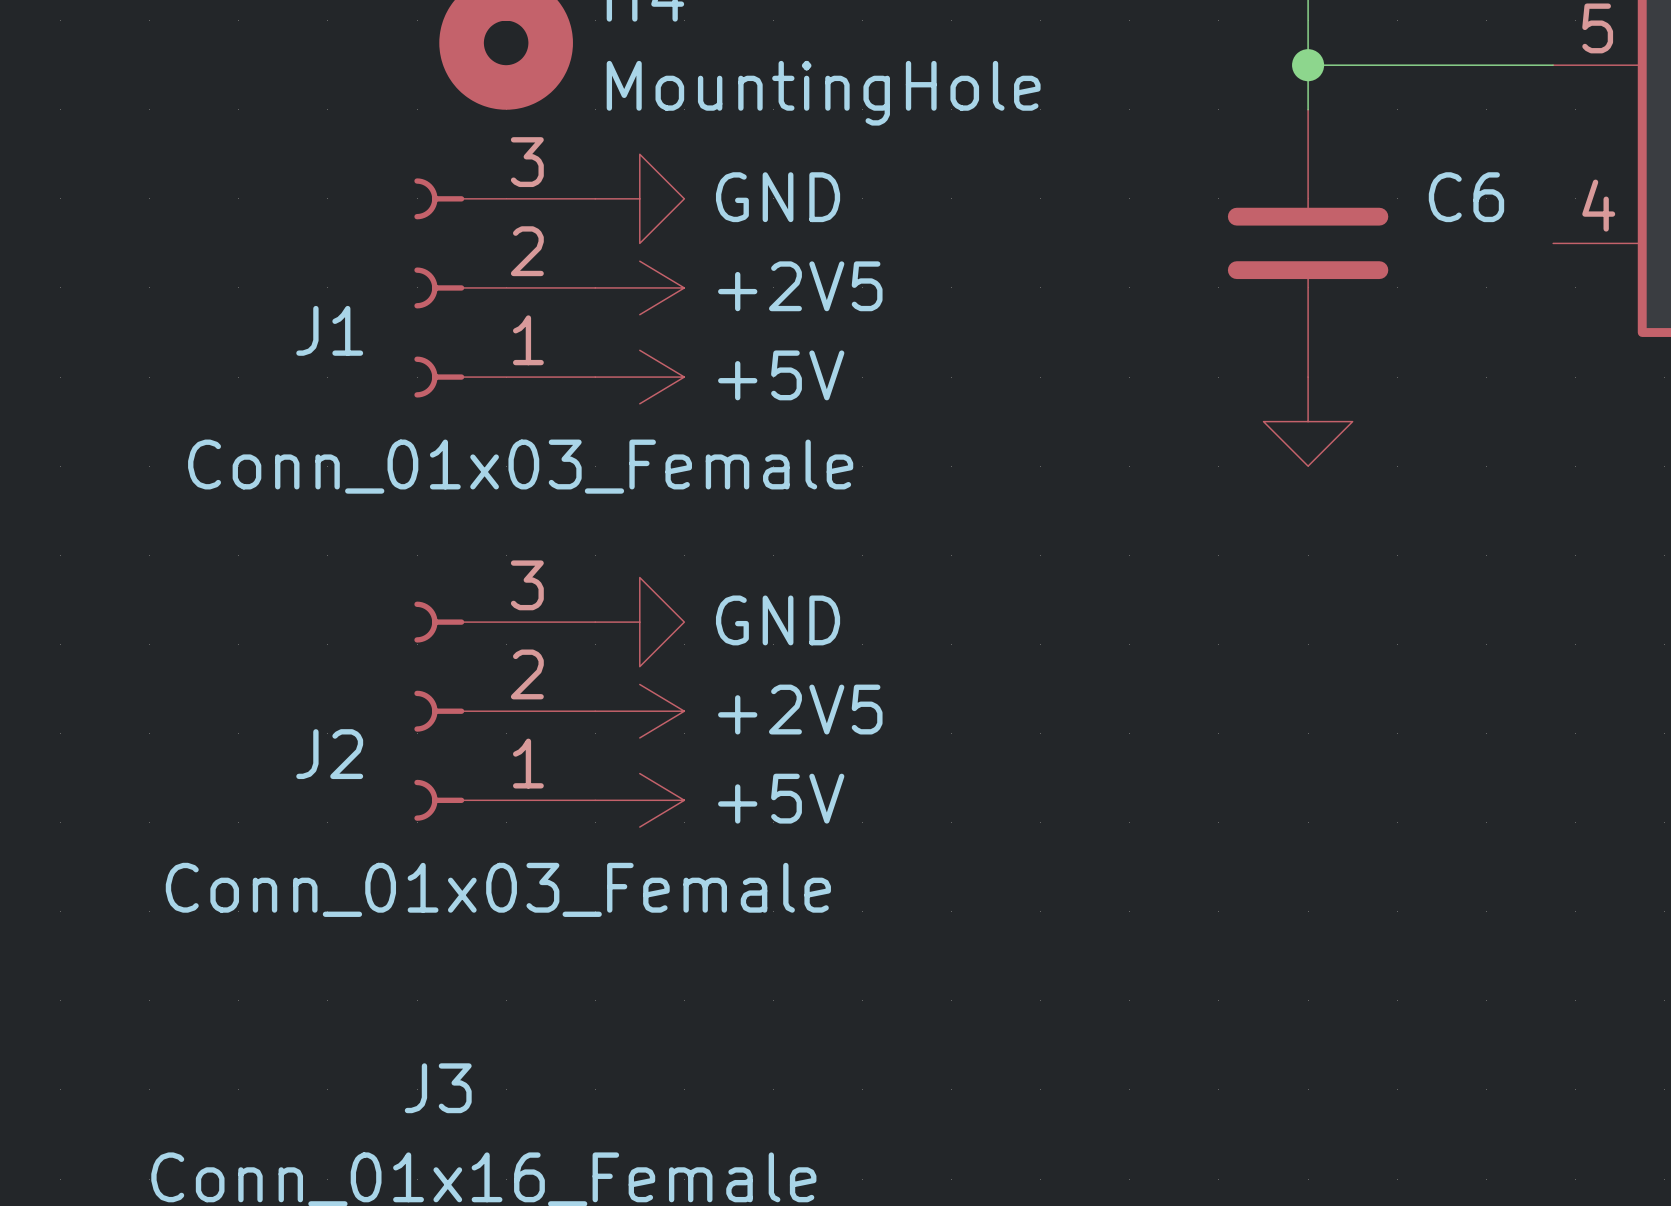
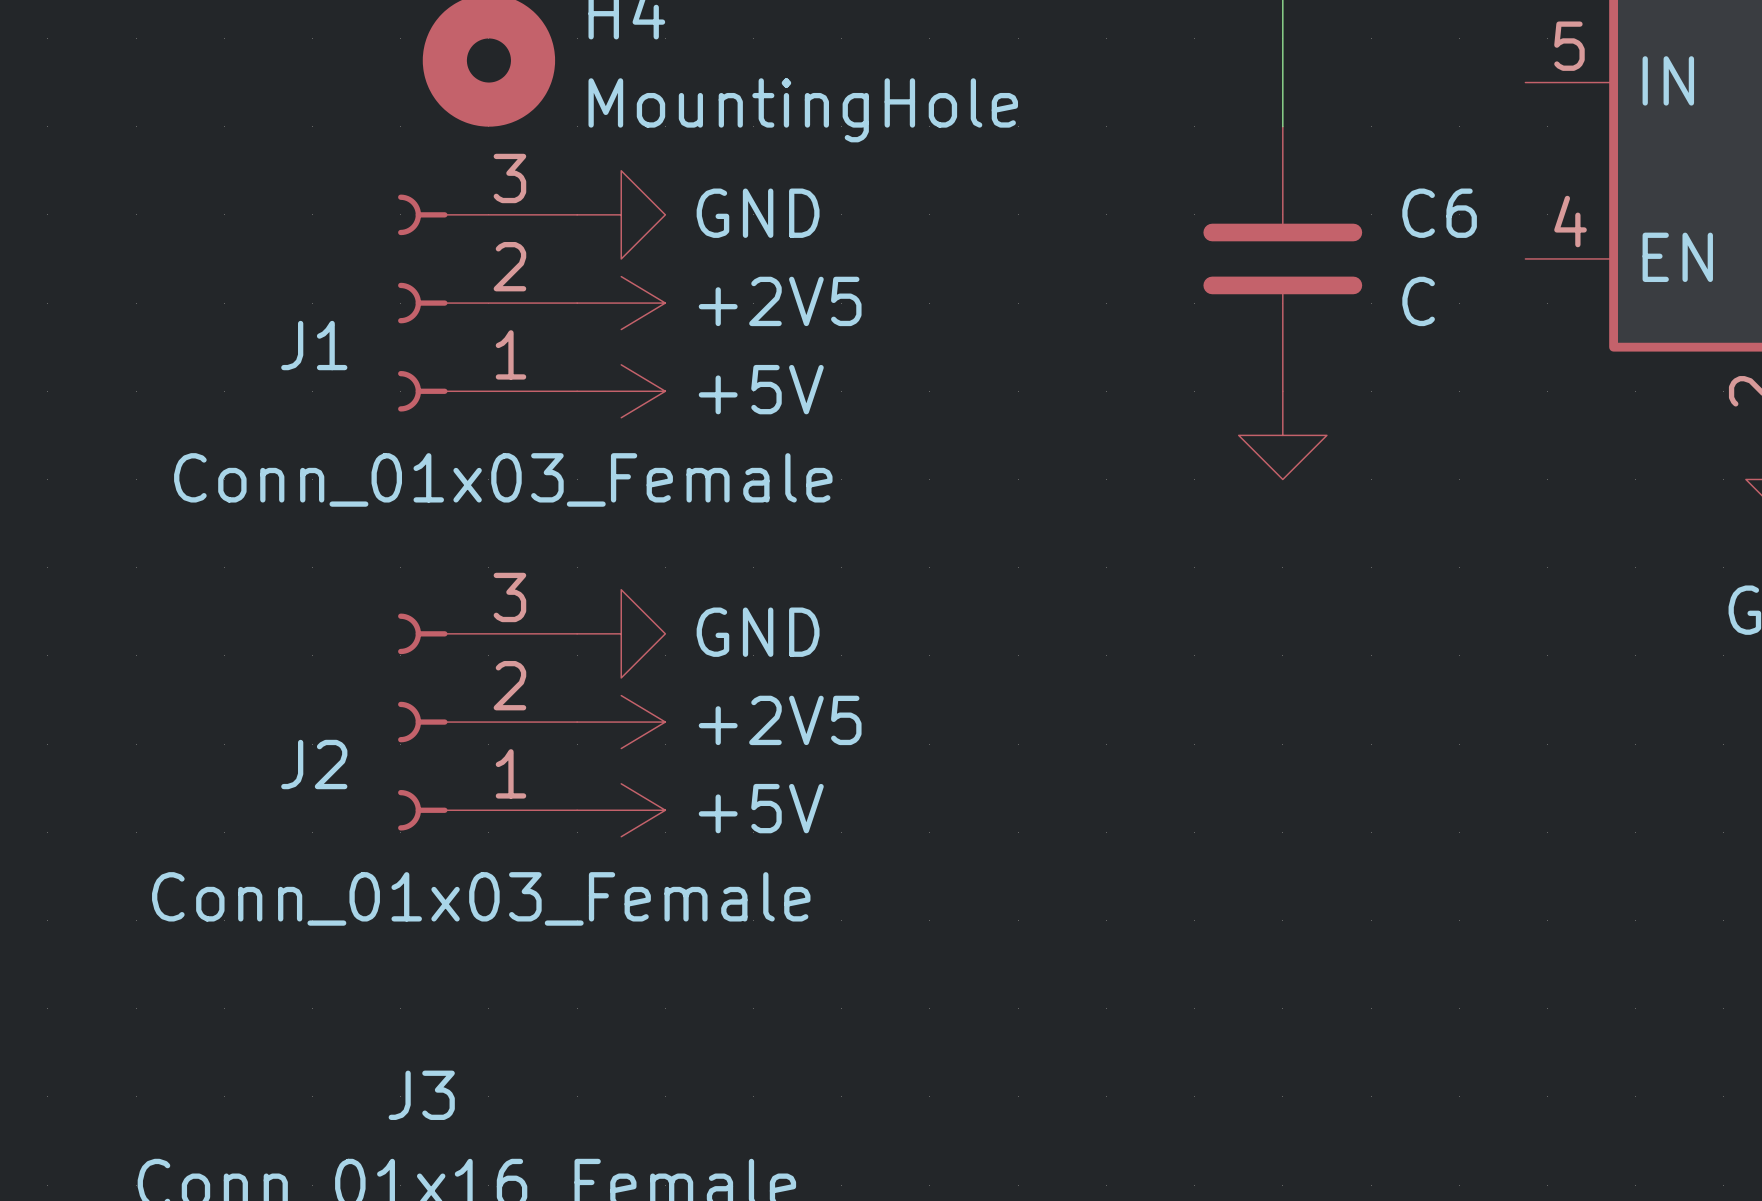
wire: (1308, 65) (1553, 65) -> none
junction: (1308, 65) -> none
C6 value: none -> C (1418, 301)

